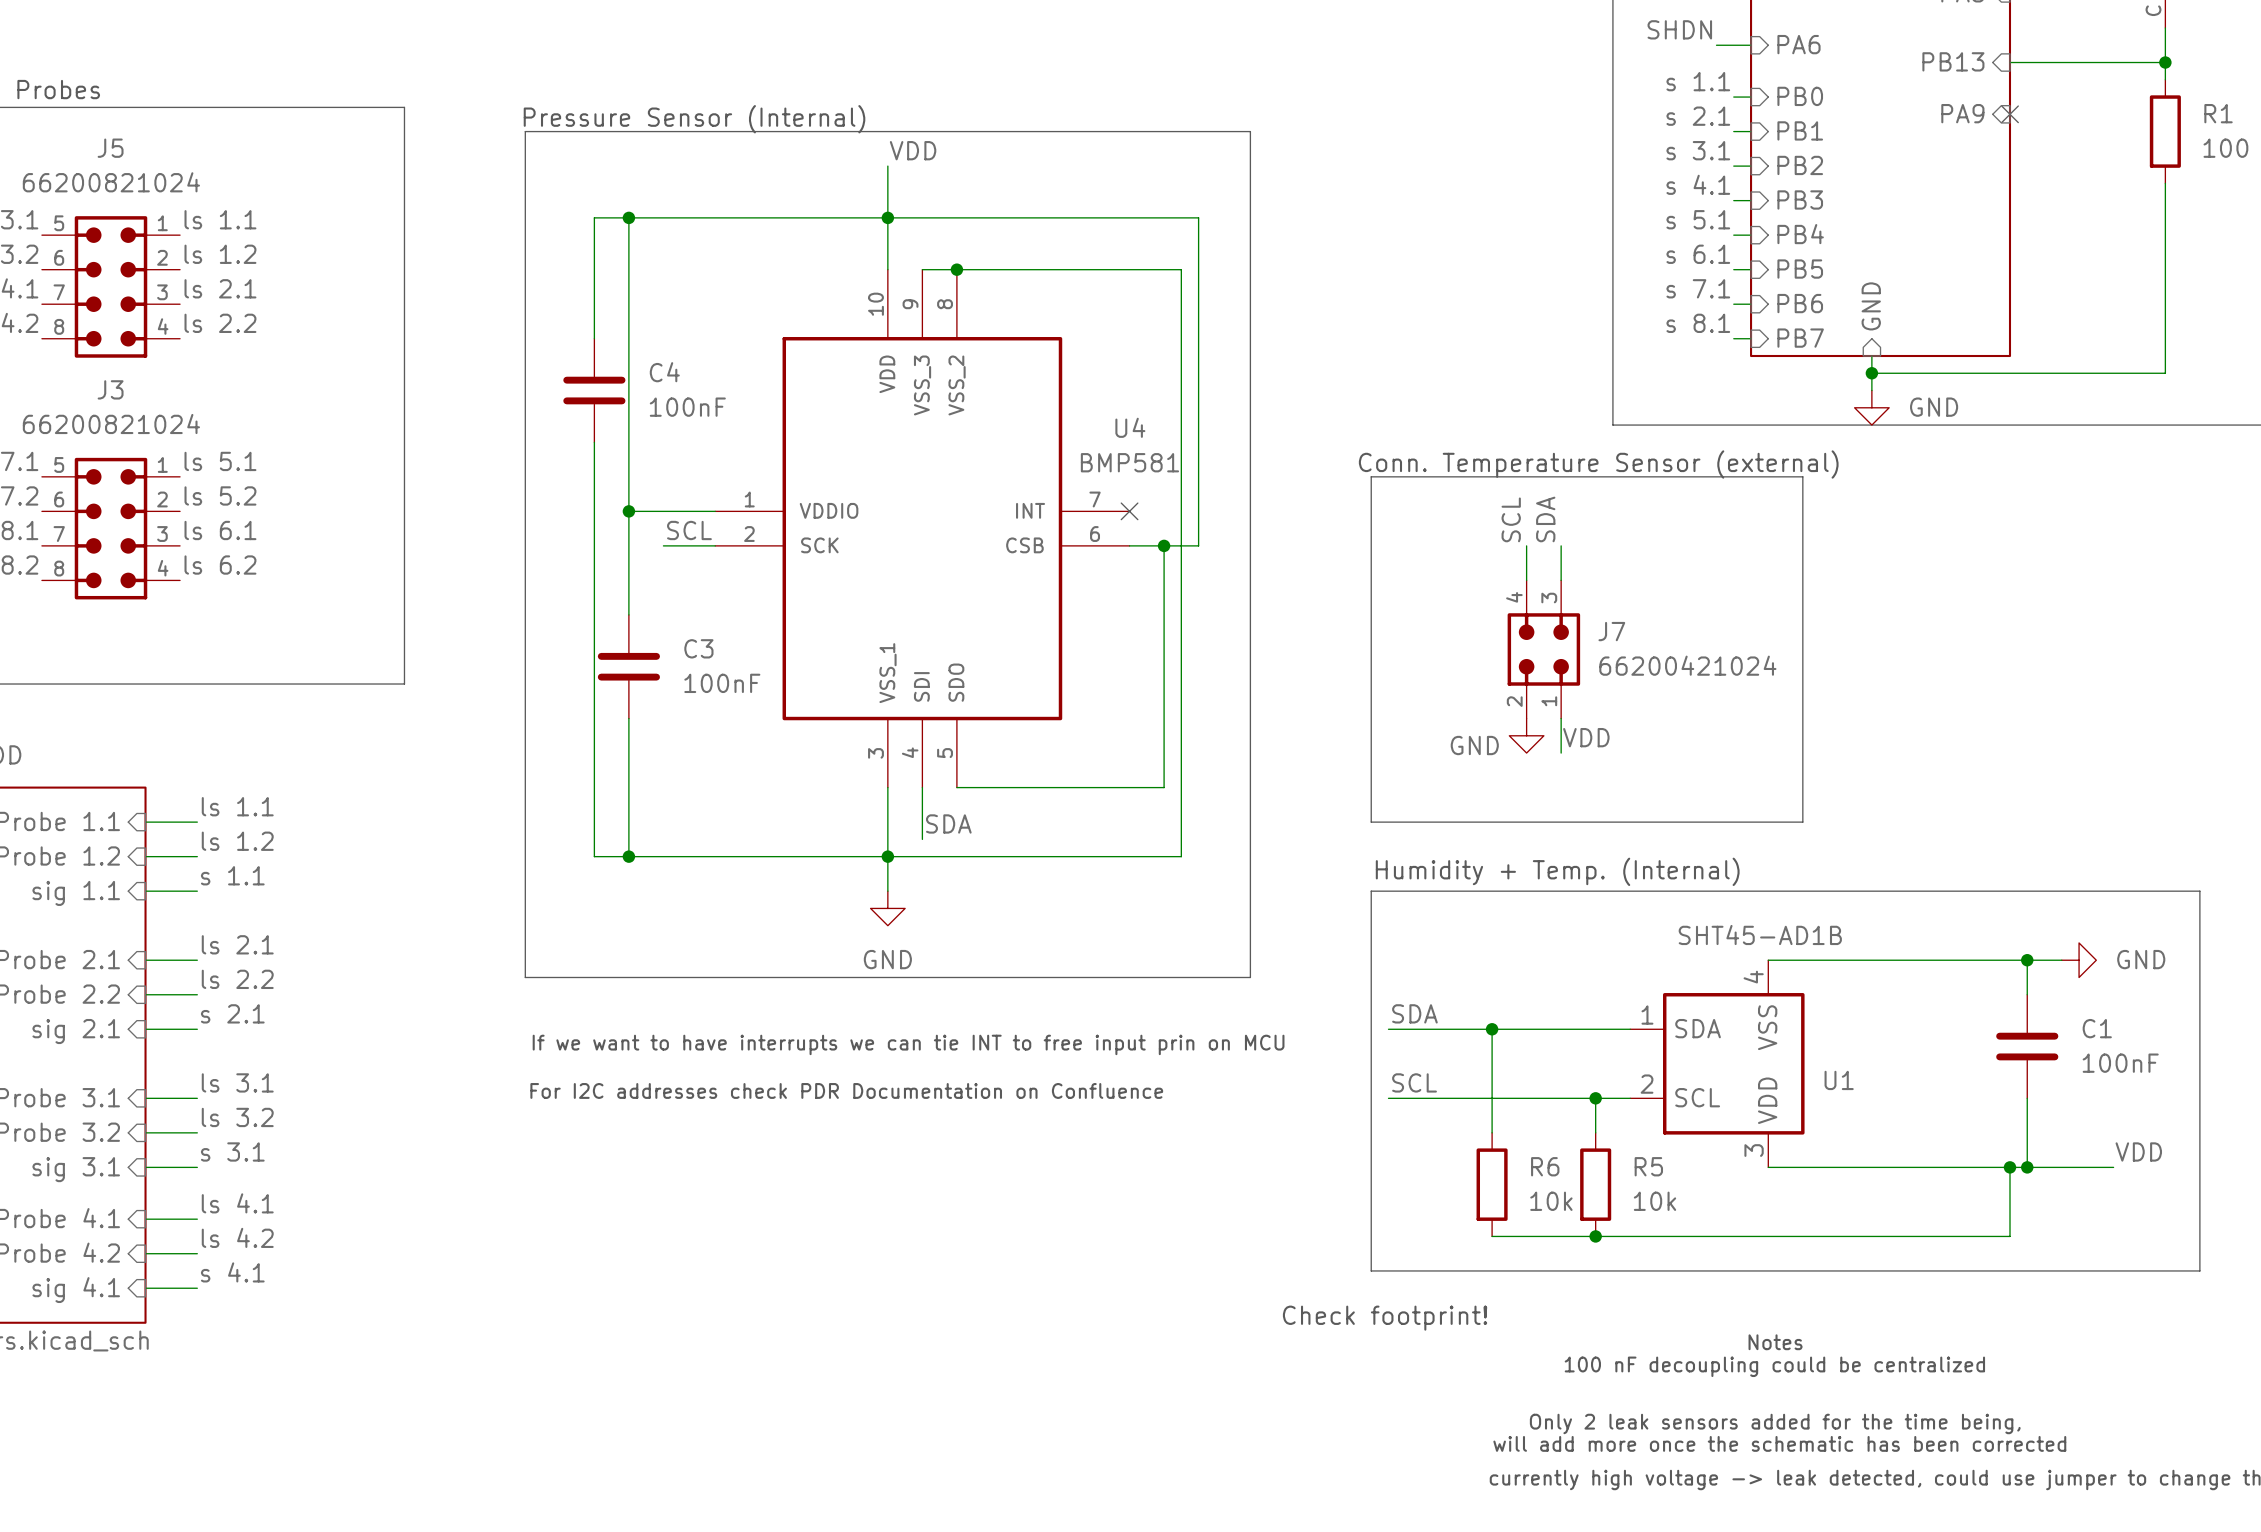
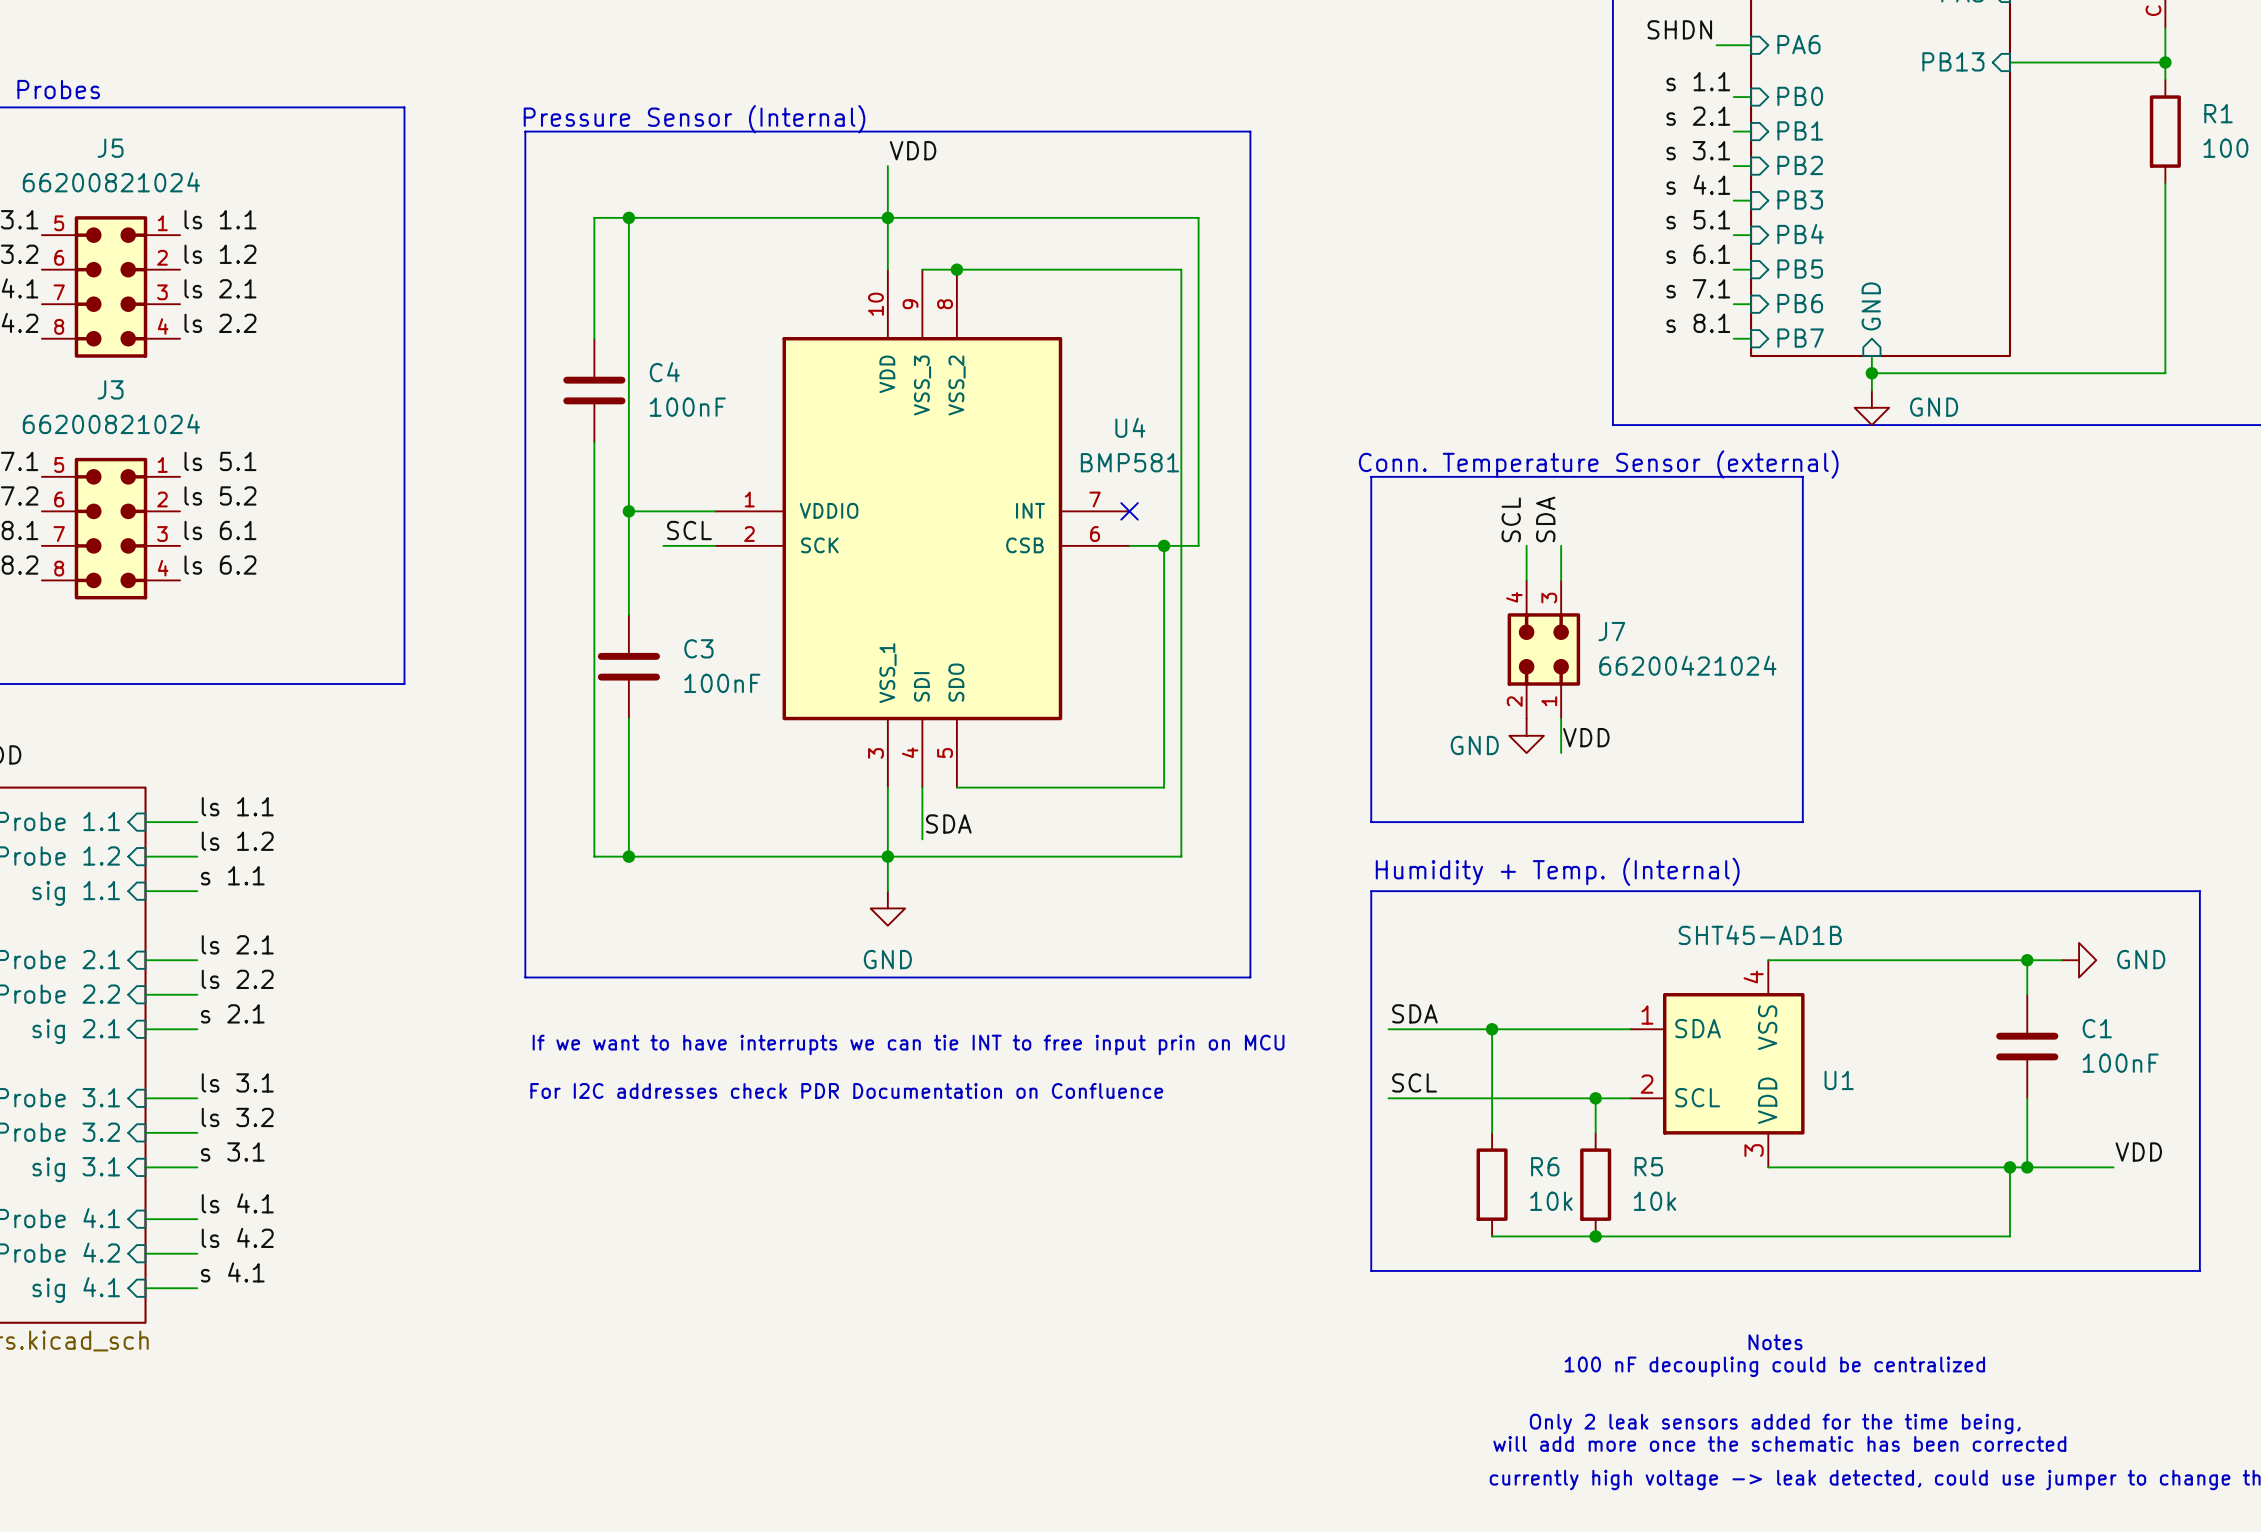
sheet pin: PA9 (1962, 113) -> none
no-connect mark: (2009, 114) -> none
text: Check footprint! (1385, 1318) -> none

